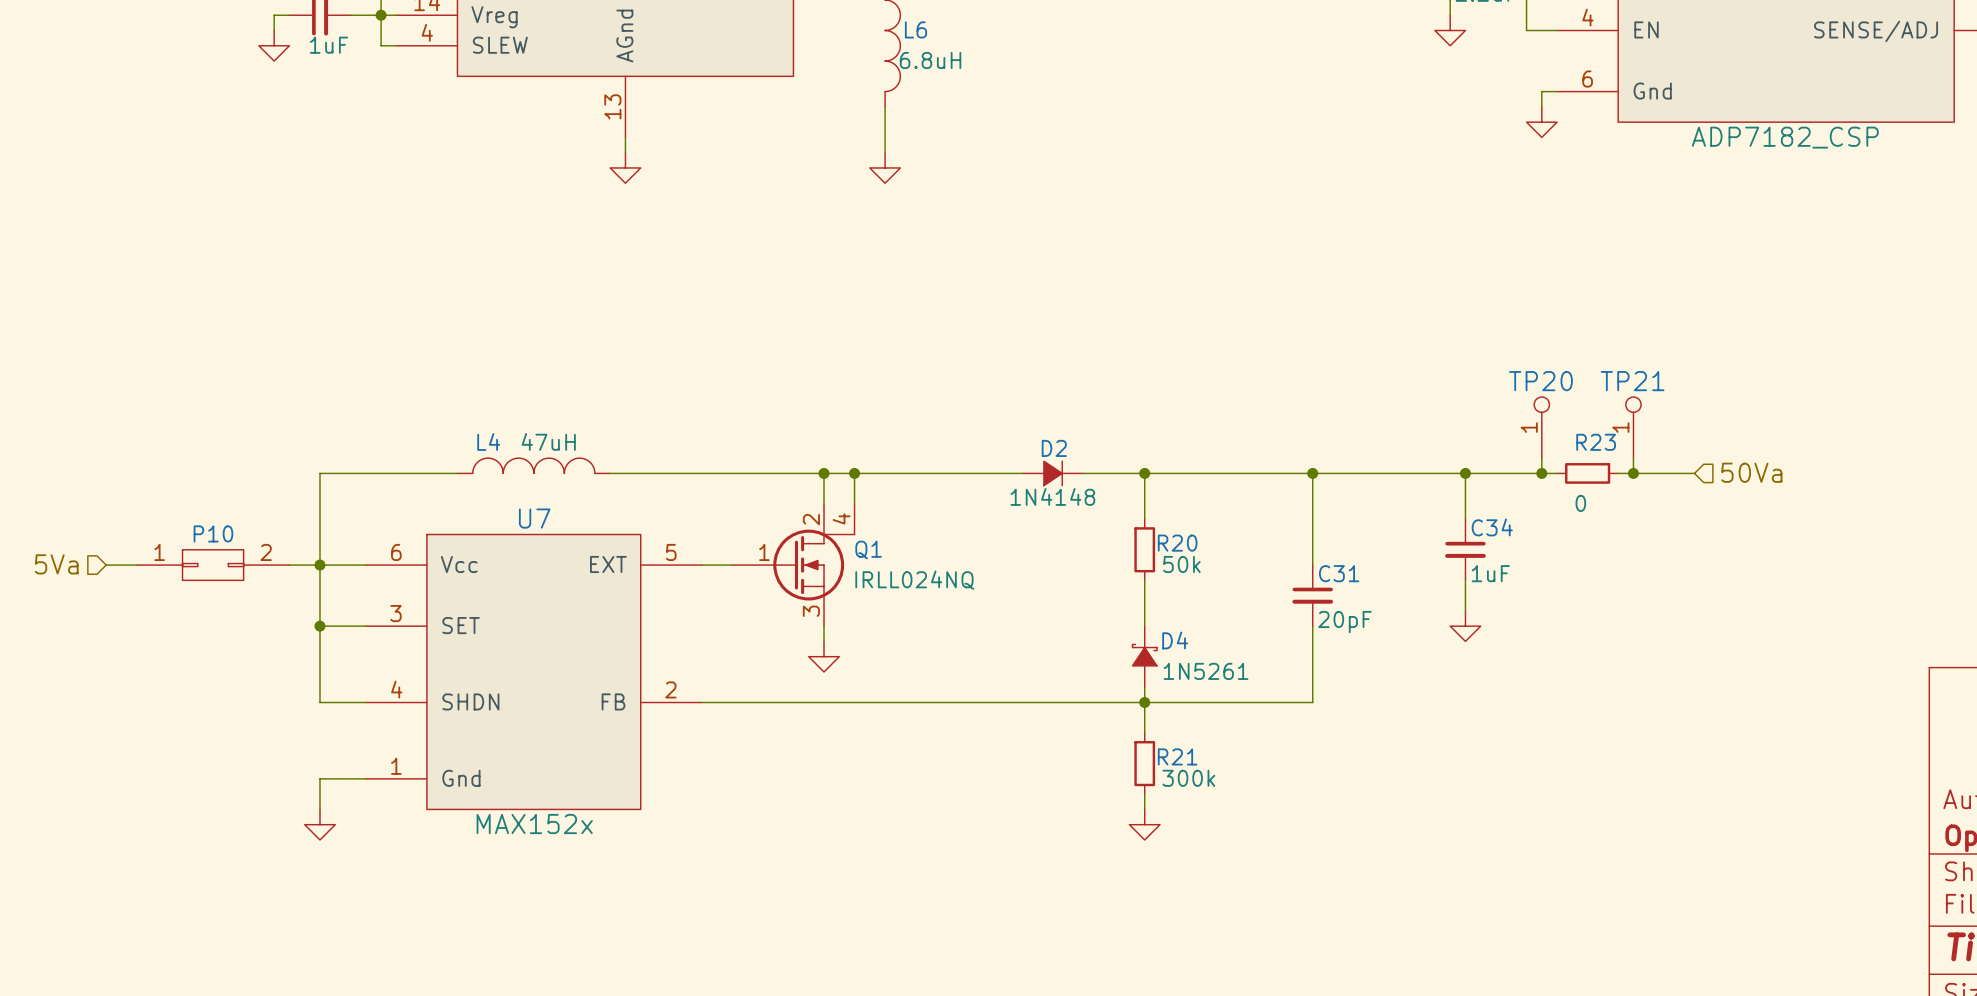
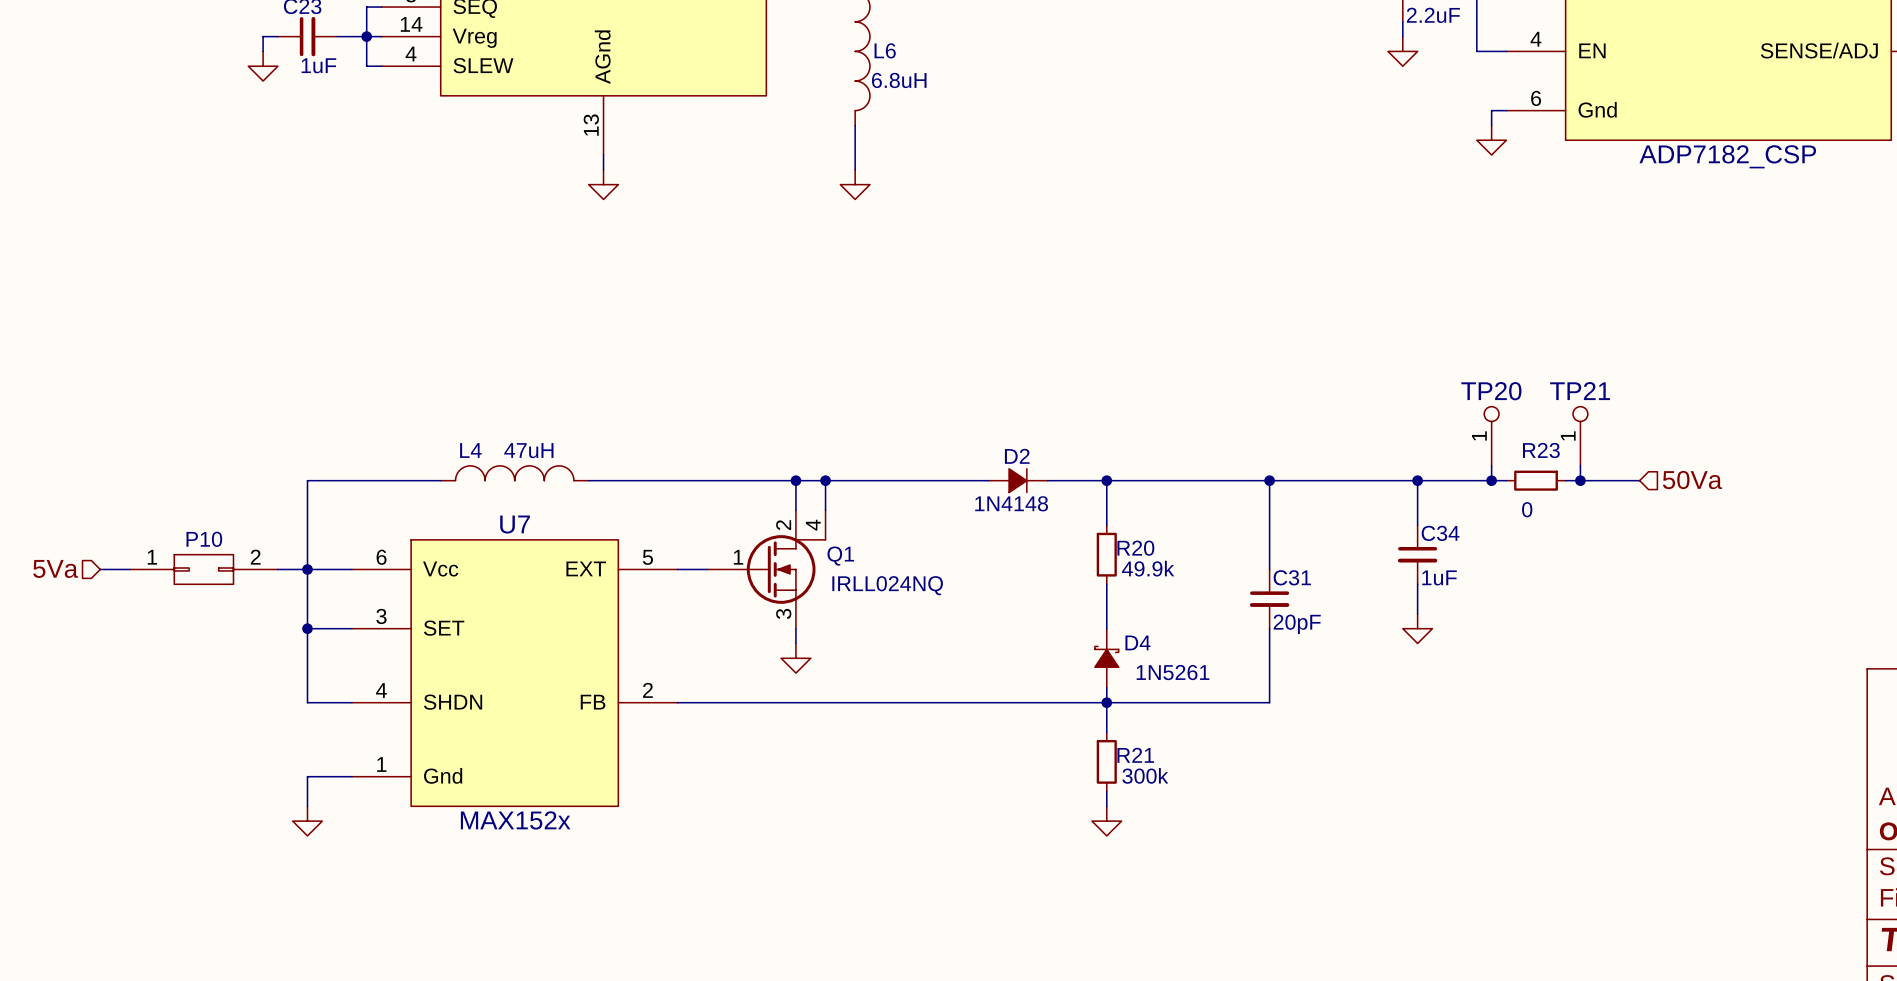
R20 value: 50k (1181, 564) -> 49.9k (1148, 568)

